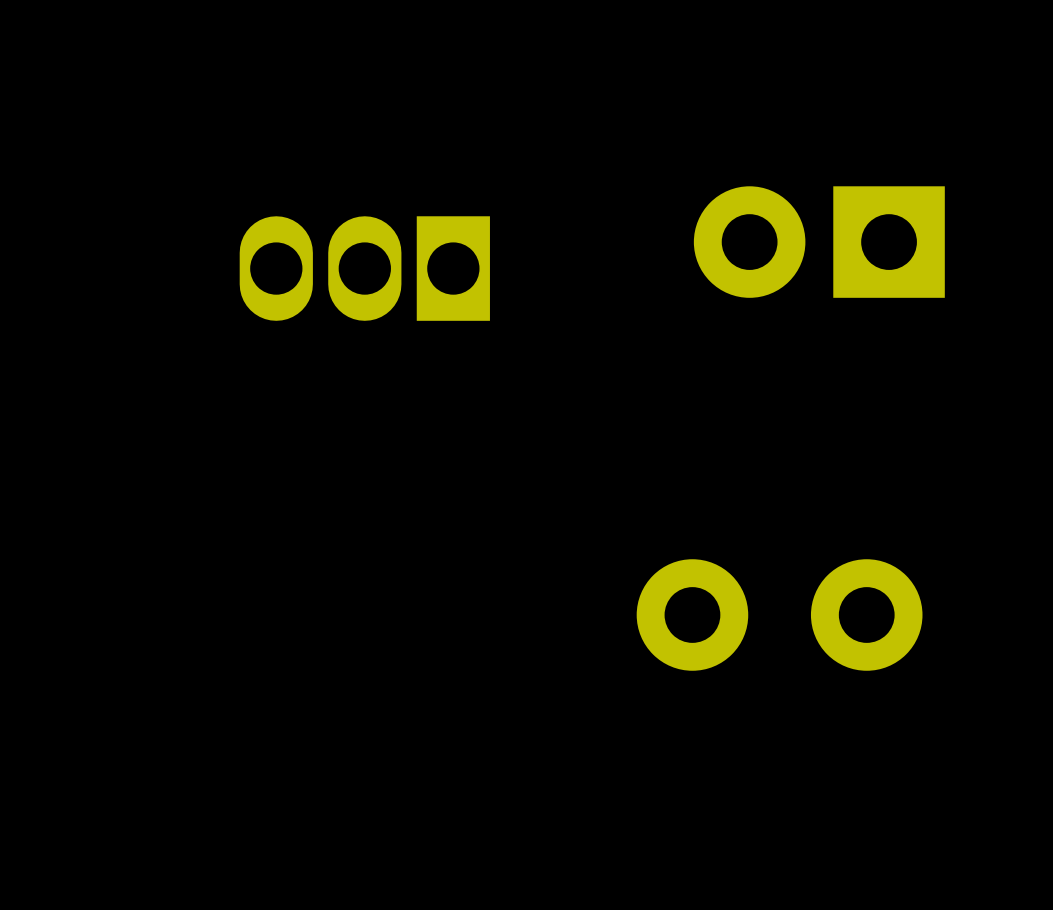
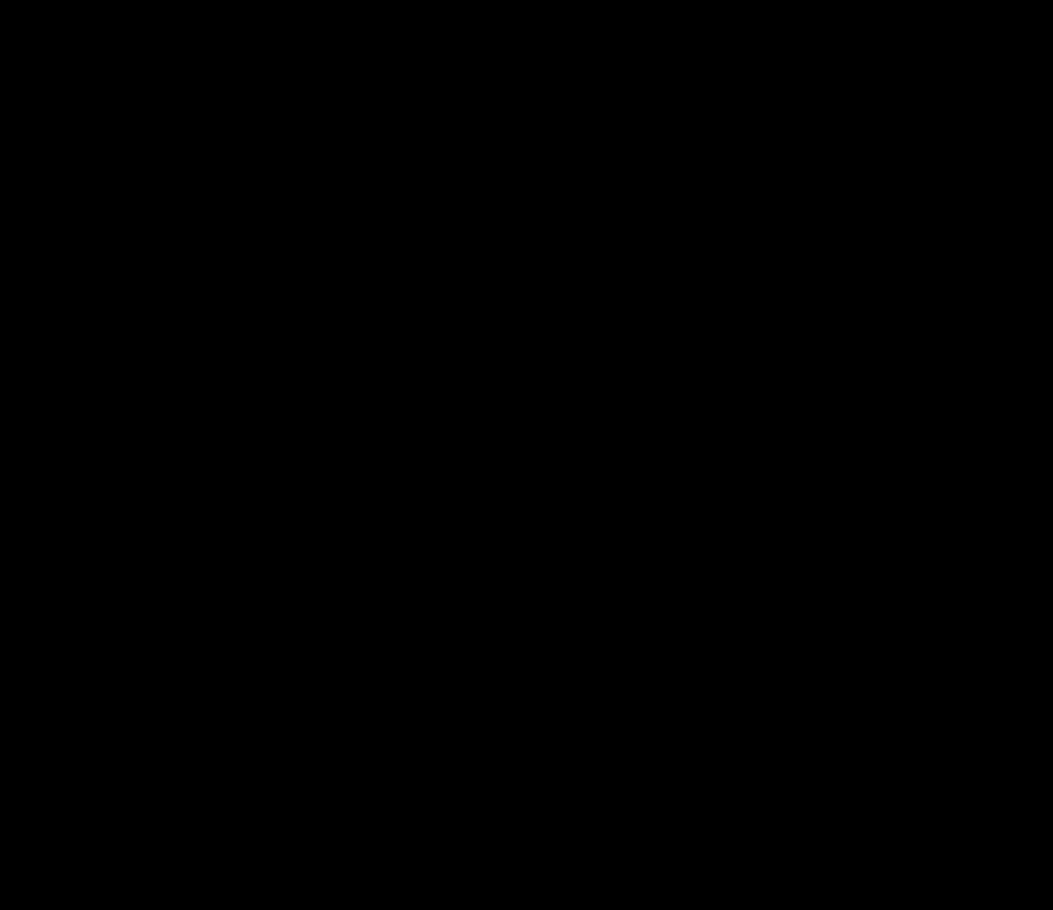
part: (819, 242) -> none
part: (364, 268) -> none
part: (779, 615) -> none

